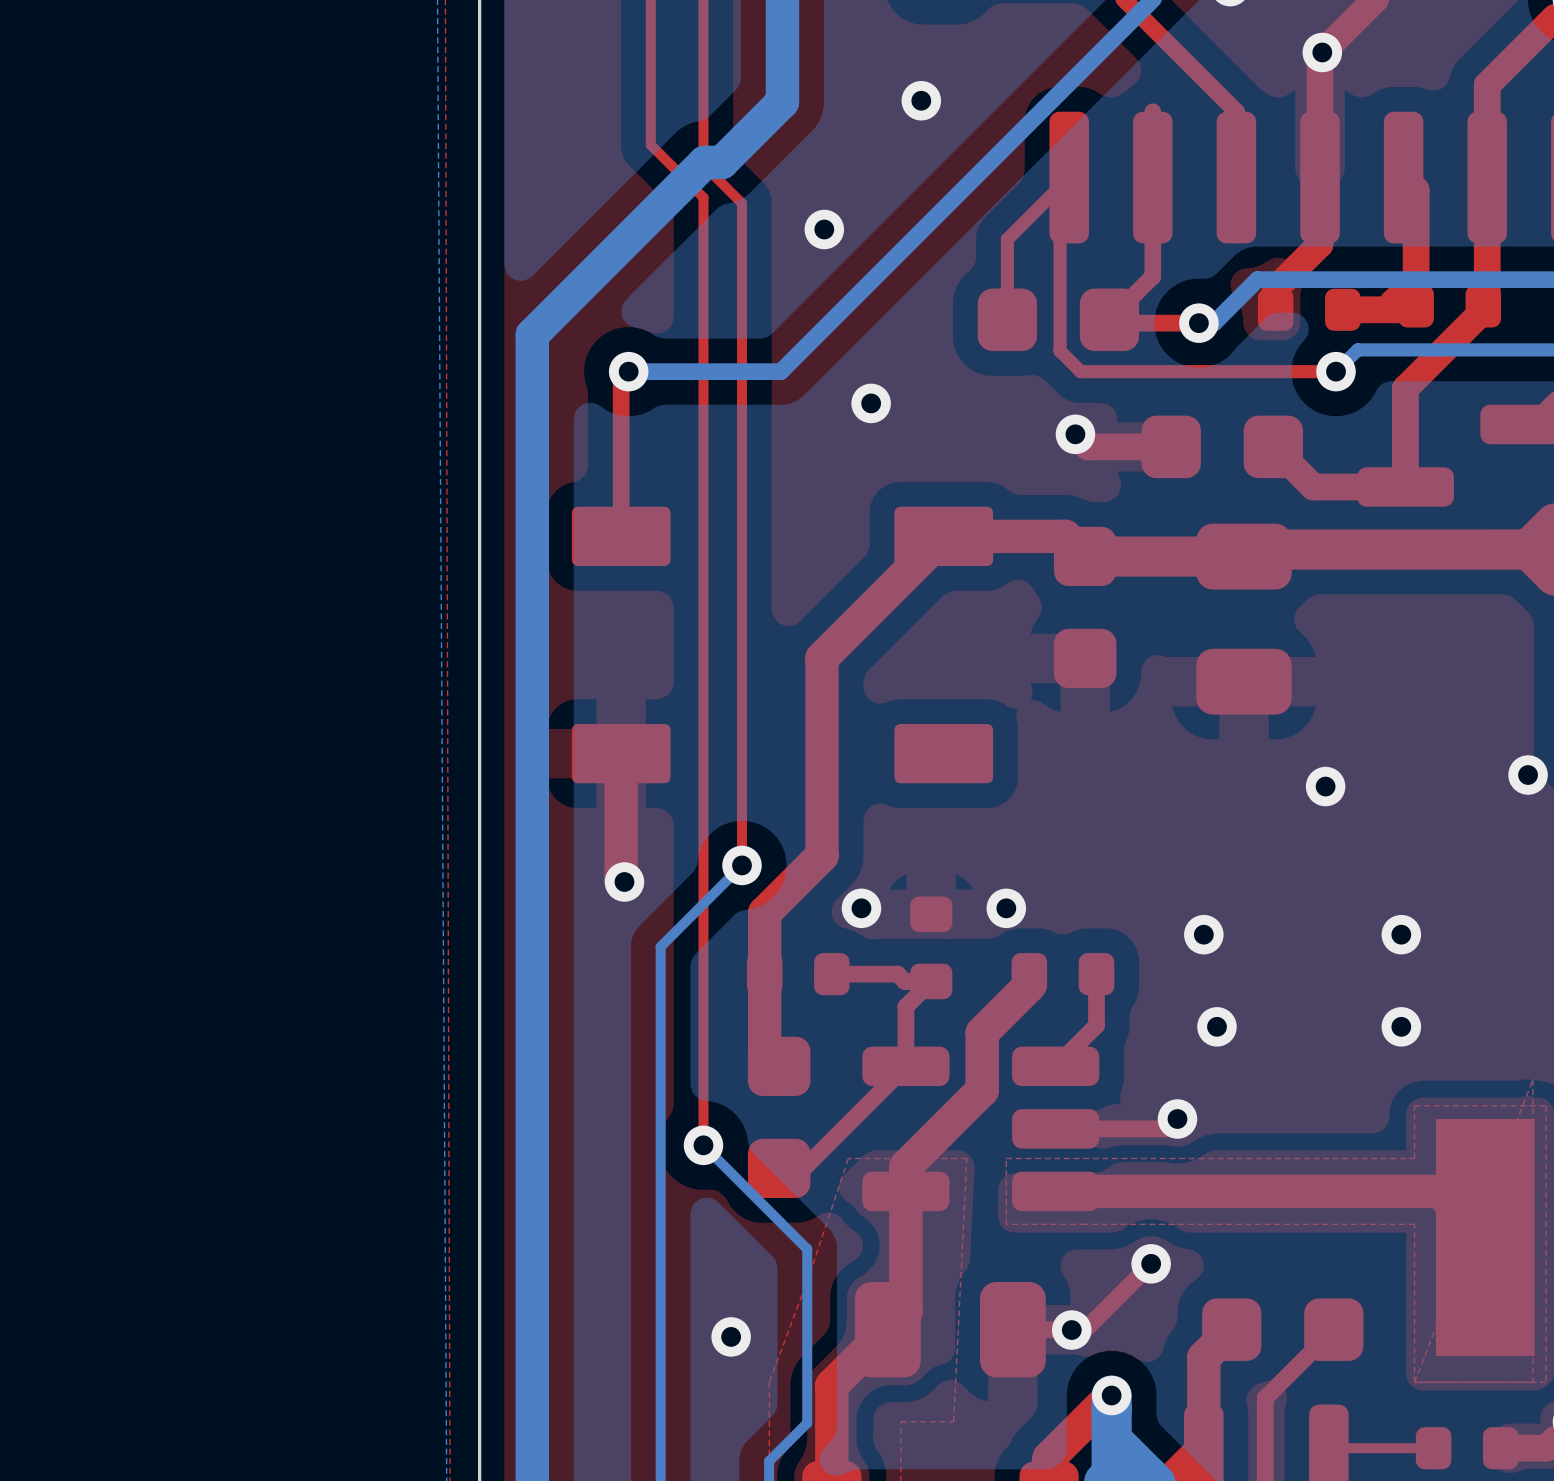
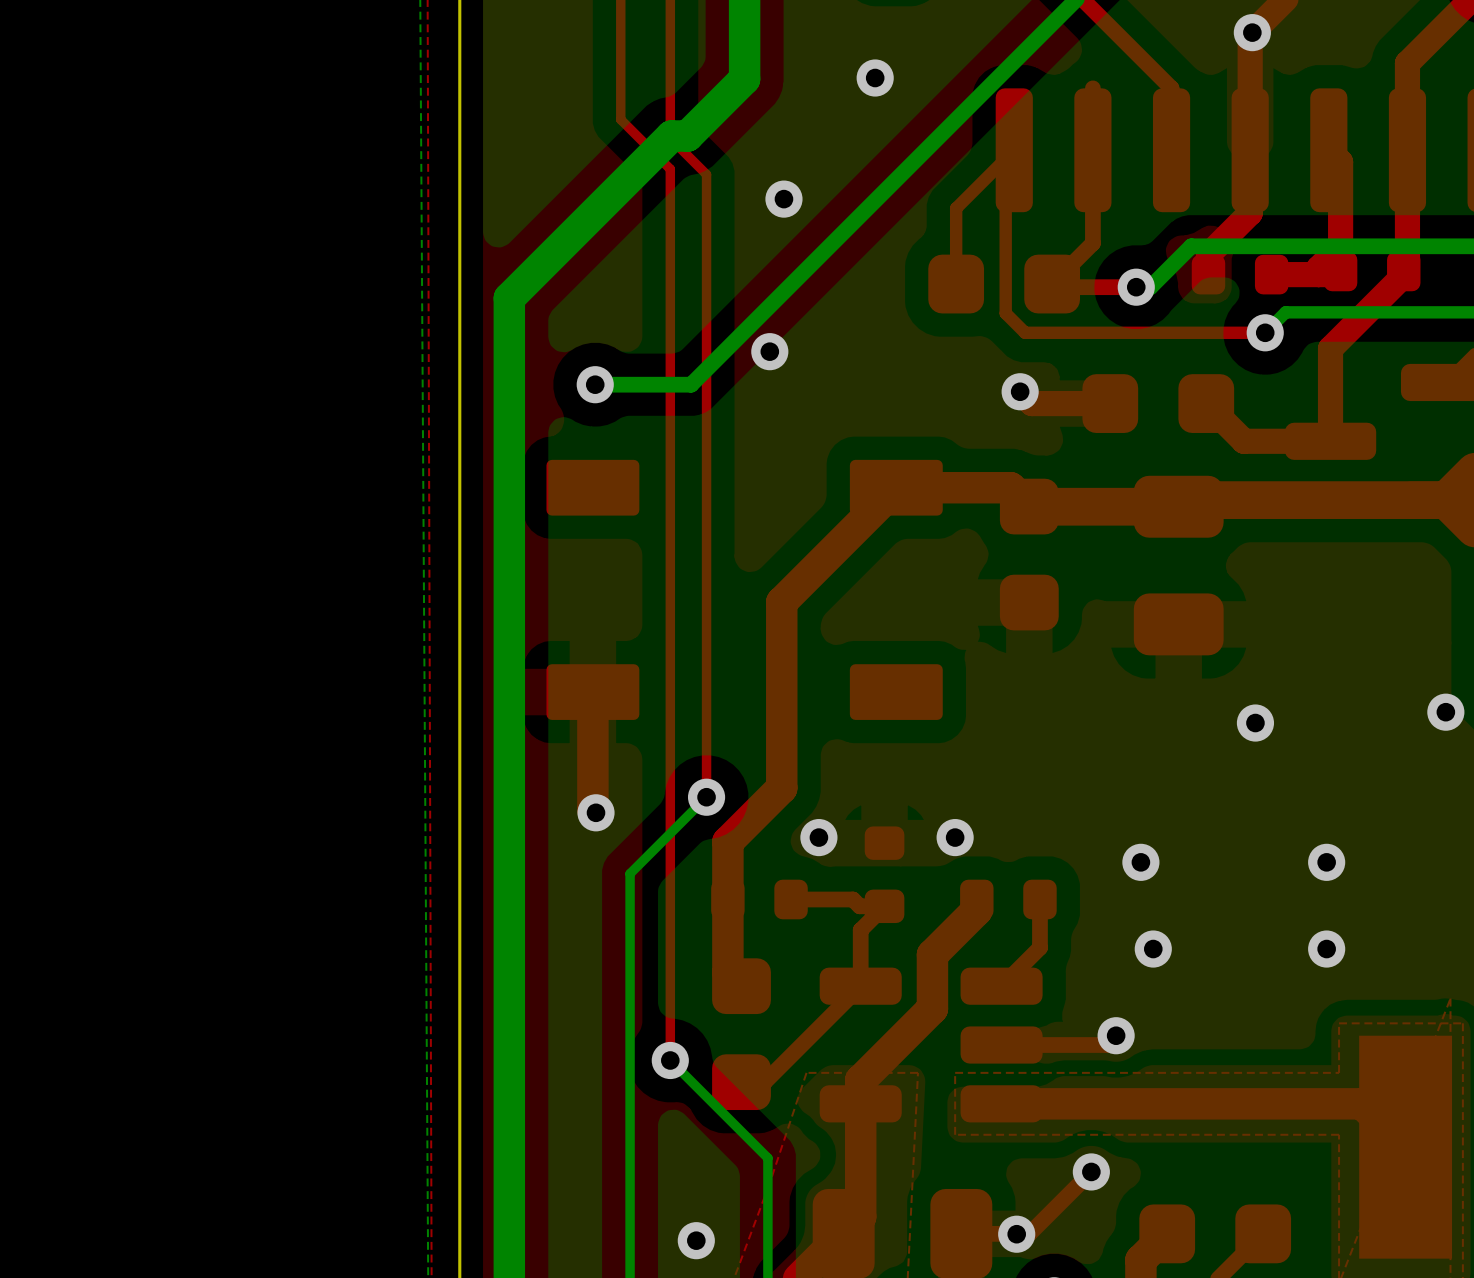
top track: (628, 371) (621, 379) (621, 536) -> none
via position: (628, 371) -> (595, 384)
bottom track: (780, 371) (628, 371) -> (743, 332) (691, 384) (595, 384)
via position: (871, 403) -> (769, 351)

